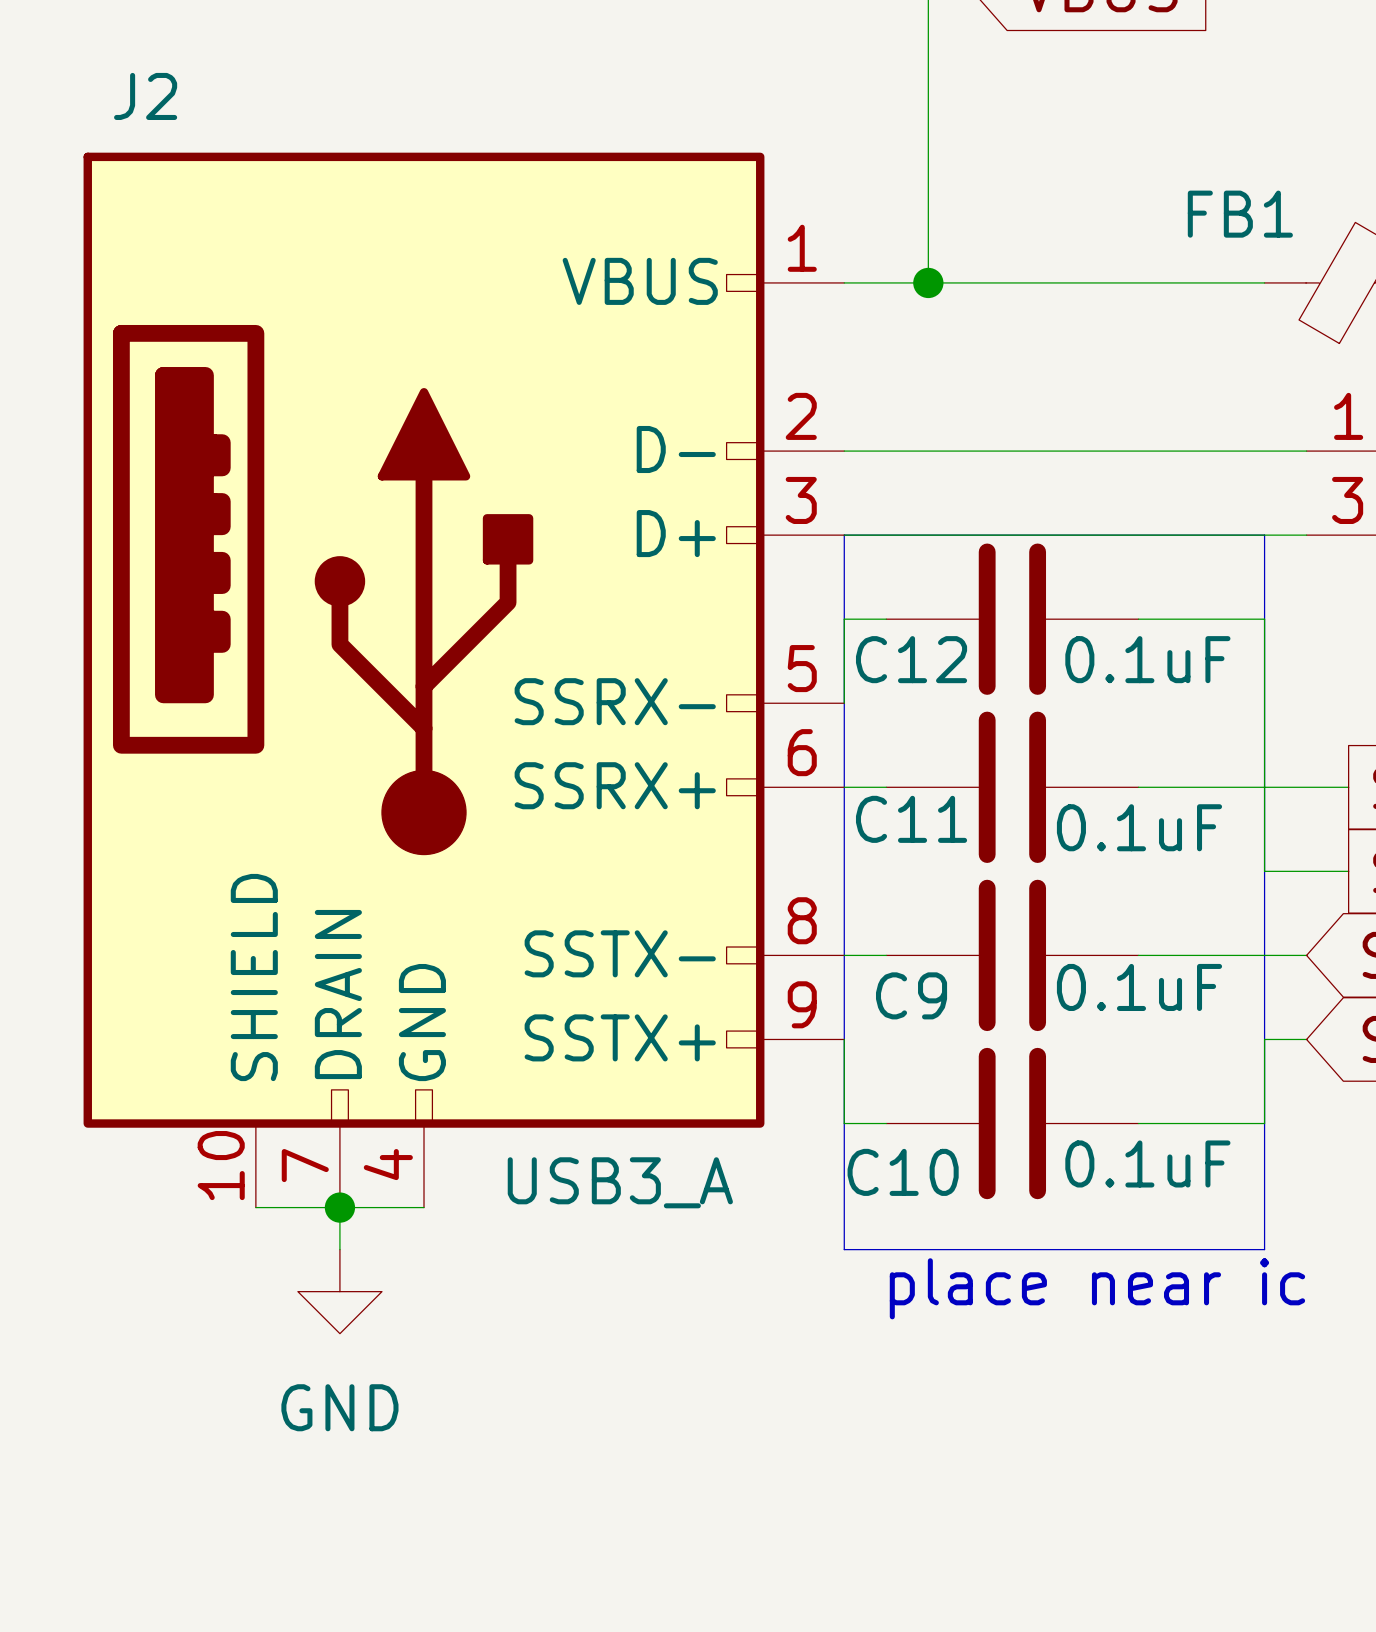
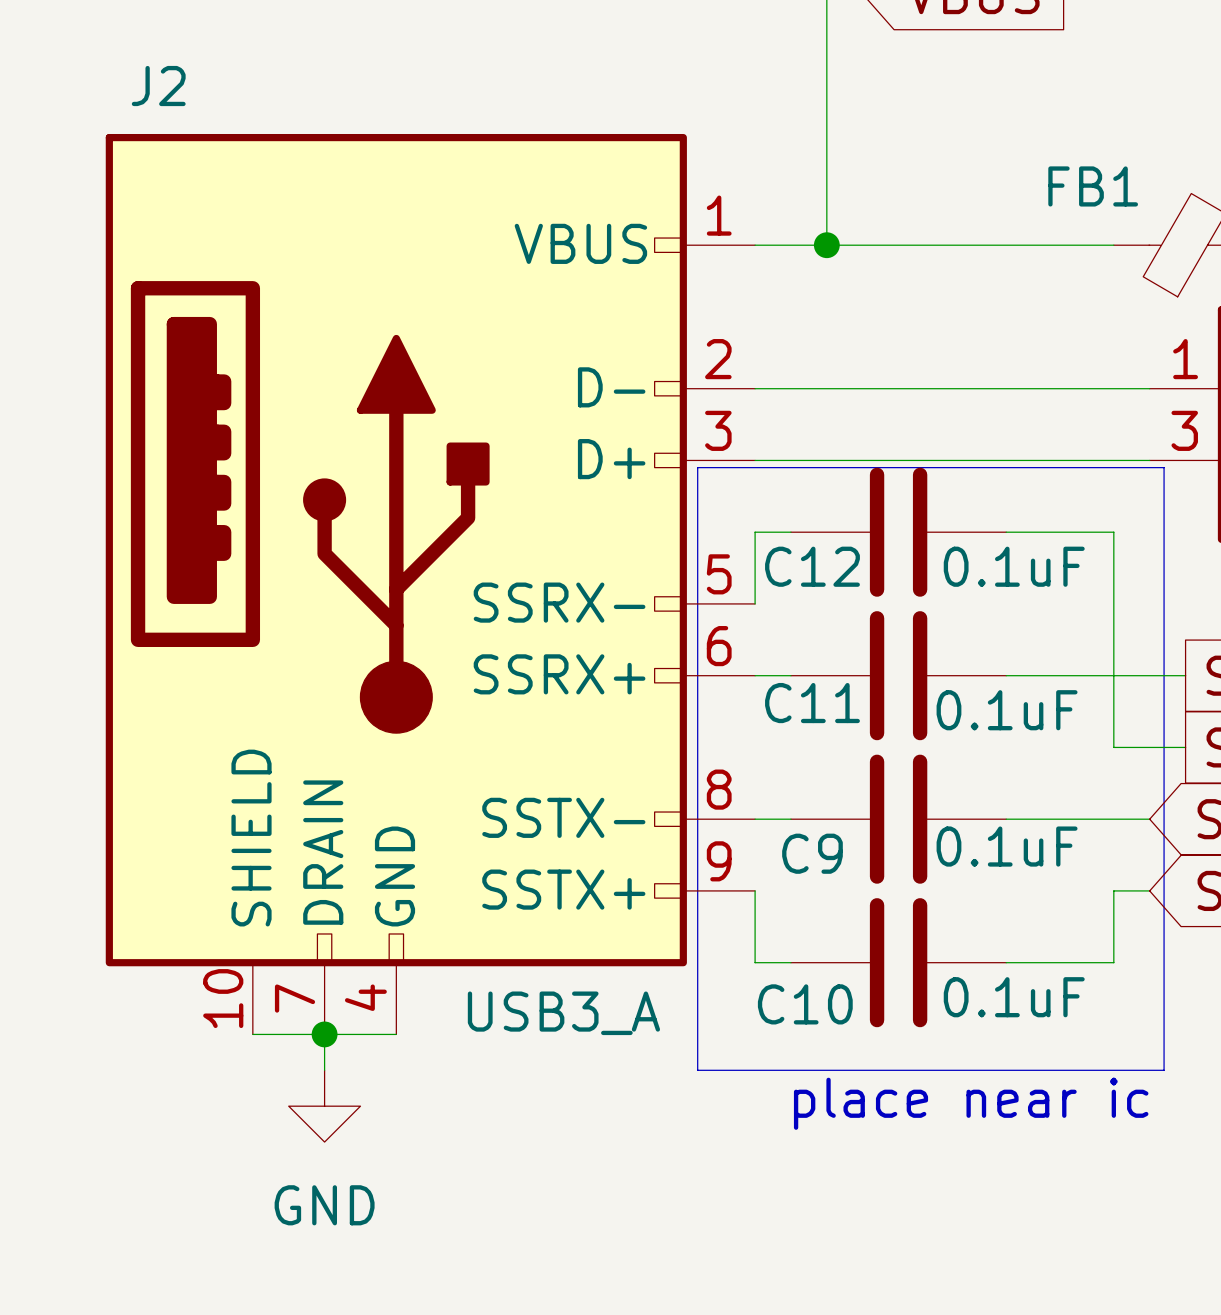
line: (844, 1249) (844, 535) (1264, 535) (1264, 1249) -> (755, 1070) (697, 1070) (697, 467) (1164, 467) (1164, 1070) (1113, 1070)

